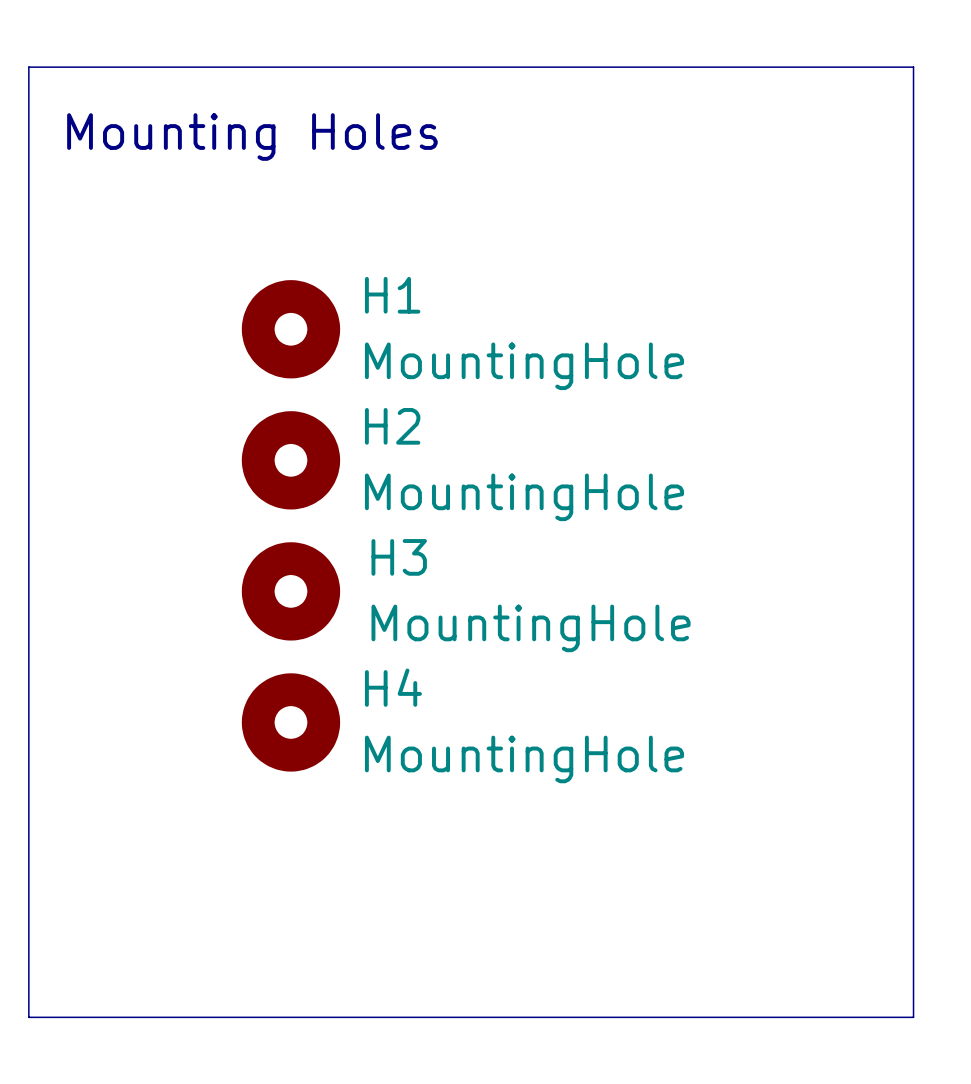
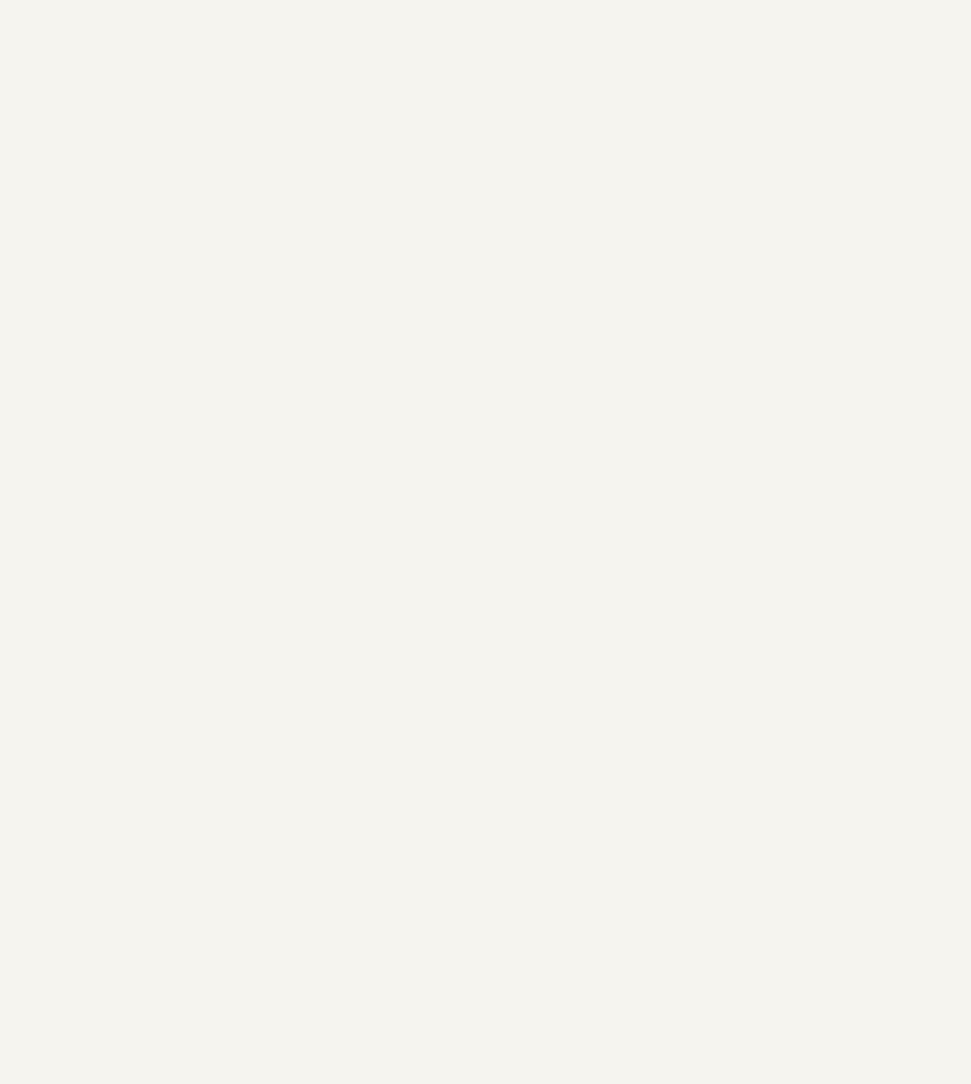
line: (28, 67) (913, 67) (913, 1017) (28, 1017) (28, 67) -> none
text: Mounting Holes (252, 137) -> none
H1: MountingHole (290, 329) -> none
H2: MountingHole (290, 460) -> none
H3: MountingHole (290, 591) -> none
H4: MountingHole (290, 722) -> none

